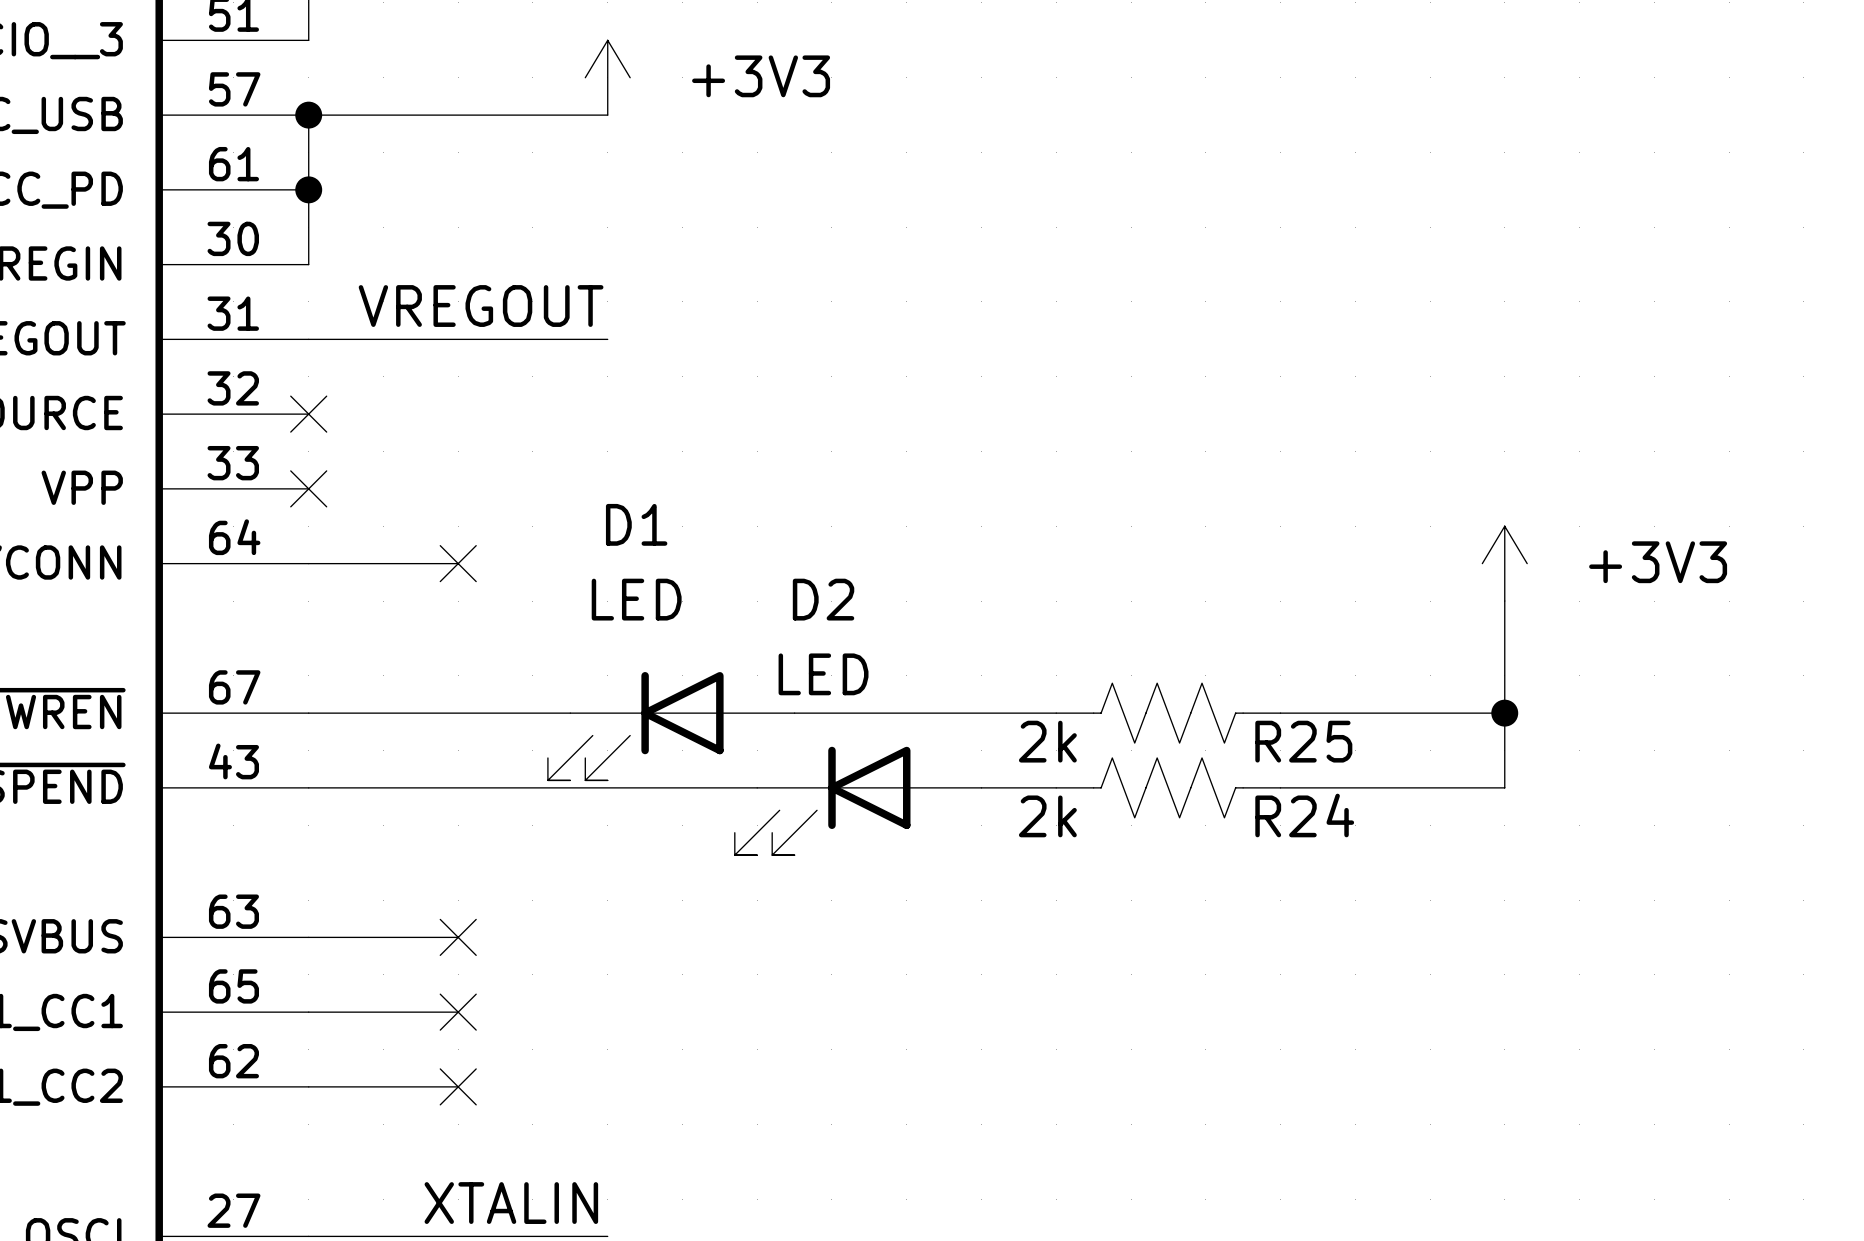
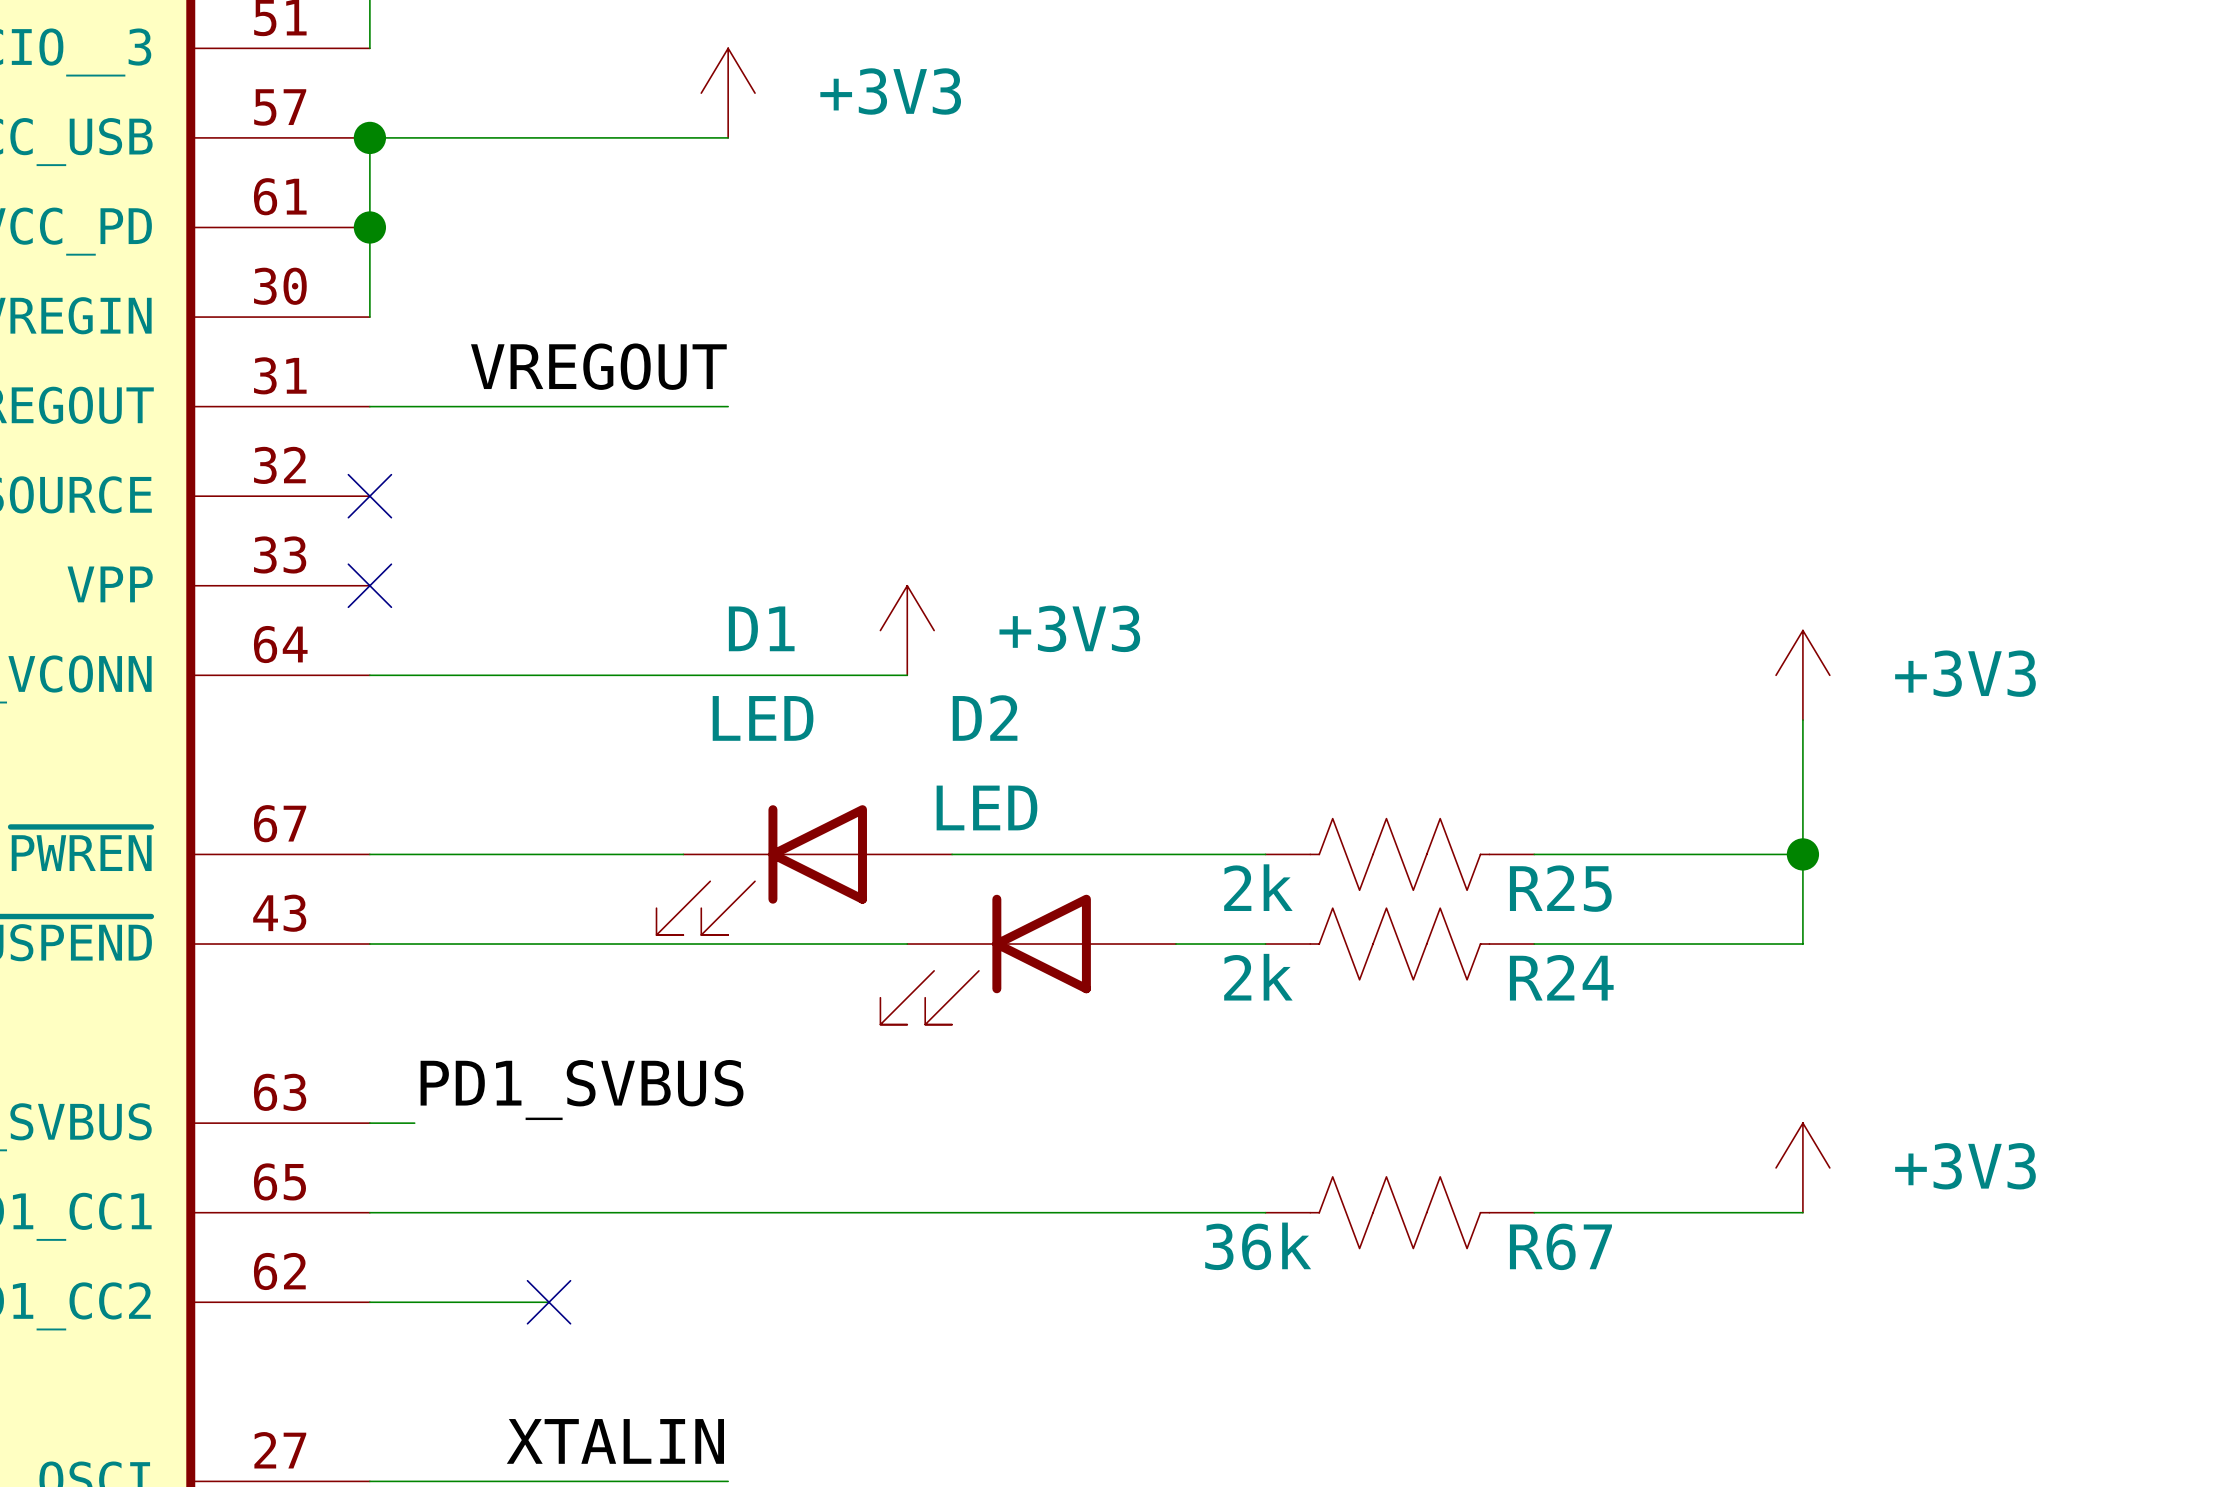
power symbol: none -> +3V3 (907, 630)
wire: none -> (549, 675) (907, 675)
no-connect mark: (458, 563) -> none
label: none -> PD1_SVBUS (582, 1090)
wire: (346, 937) (458, 937) -> none
no-connect mark: (458, 937) -> none
power symbol: none -> +3V3 (1802, 1167)
wire: none -> (549, 1212) (1265, 1212)
no-connect mark: (458, 1012) -> none
R67: none -> 36k (1399, 1212)
wire: none -> (1534, 1212) (1802, 1212)

